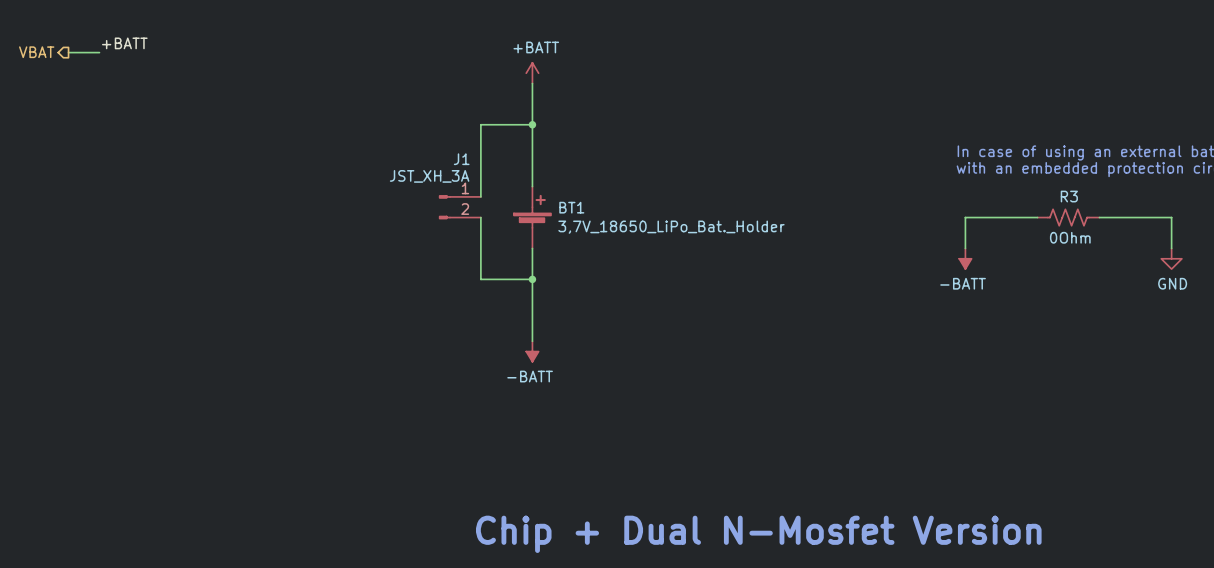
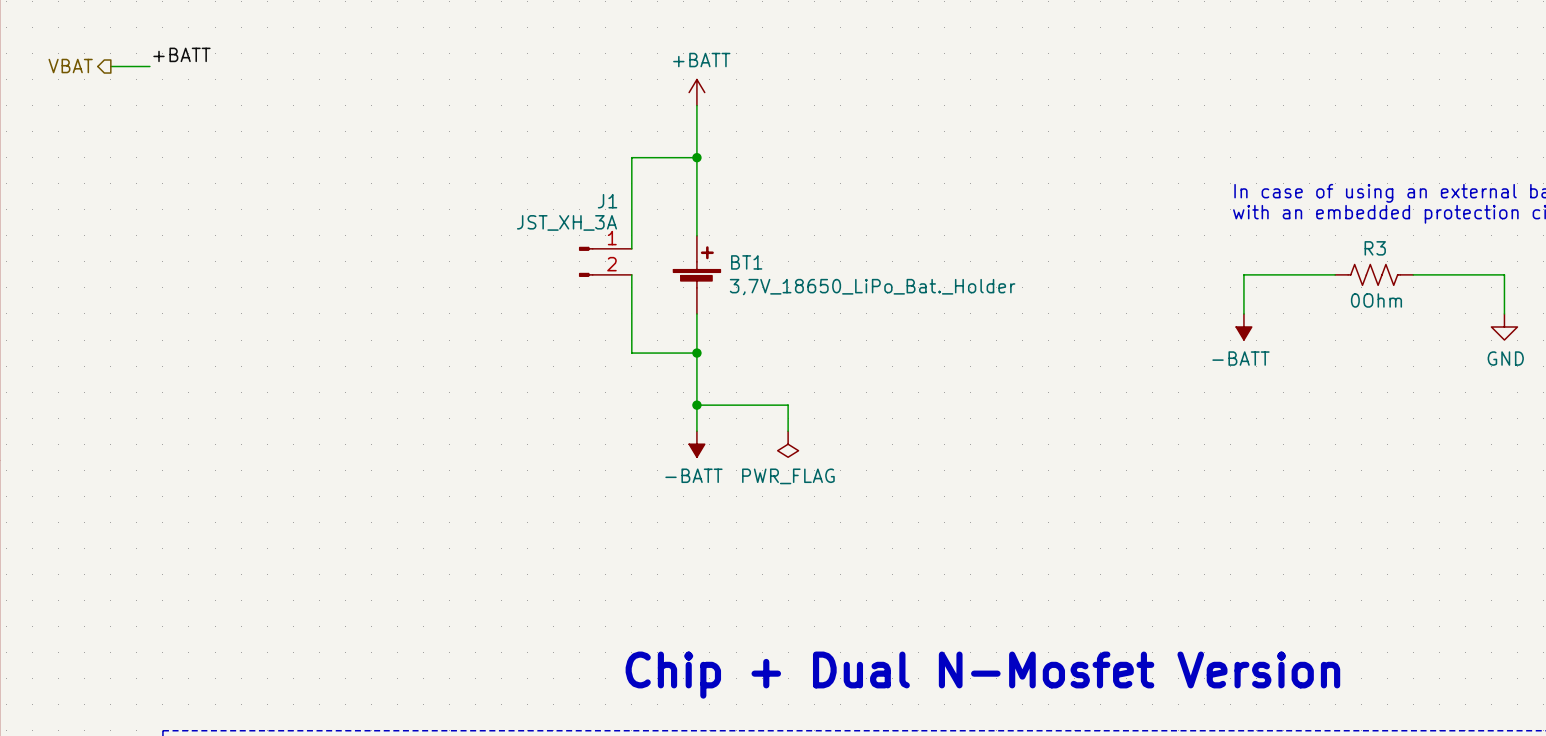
wire: none -> (696, 405) (788, 405) (788, 431)
junction: none -> (696, 405)
power symbol: none -> PWR_FLAG (788, 444)

